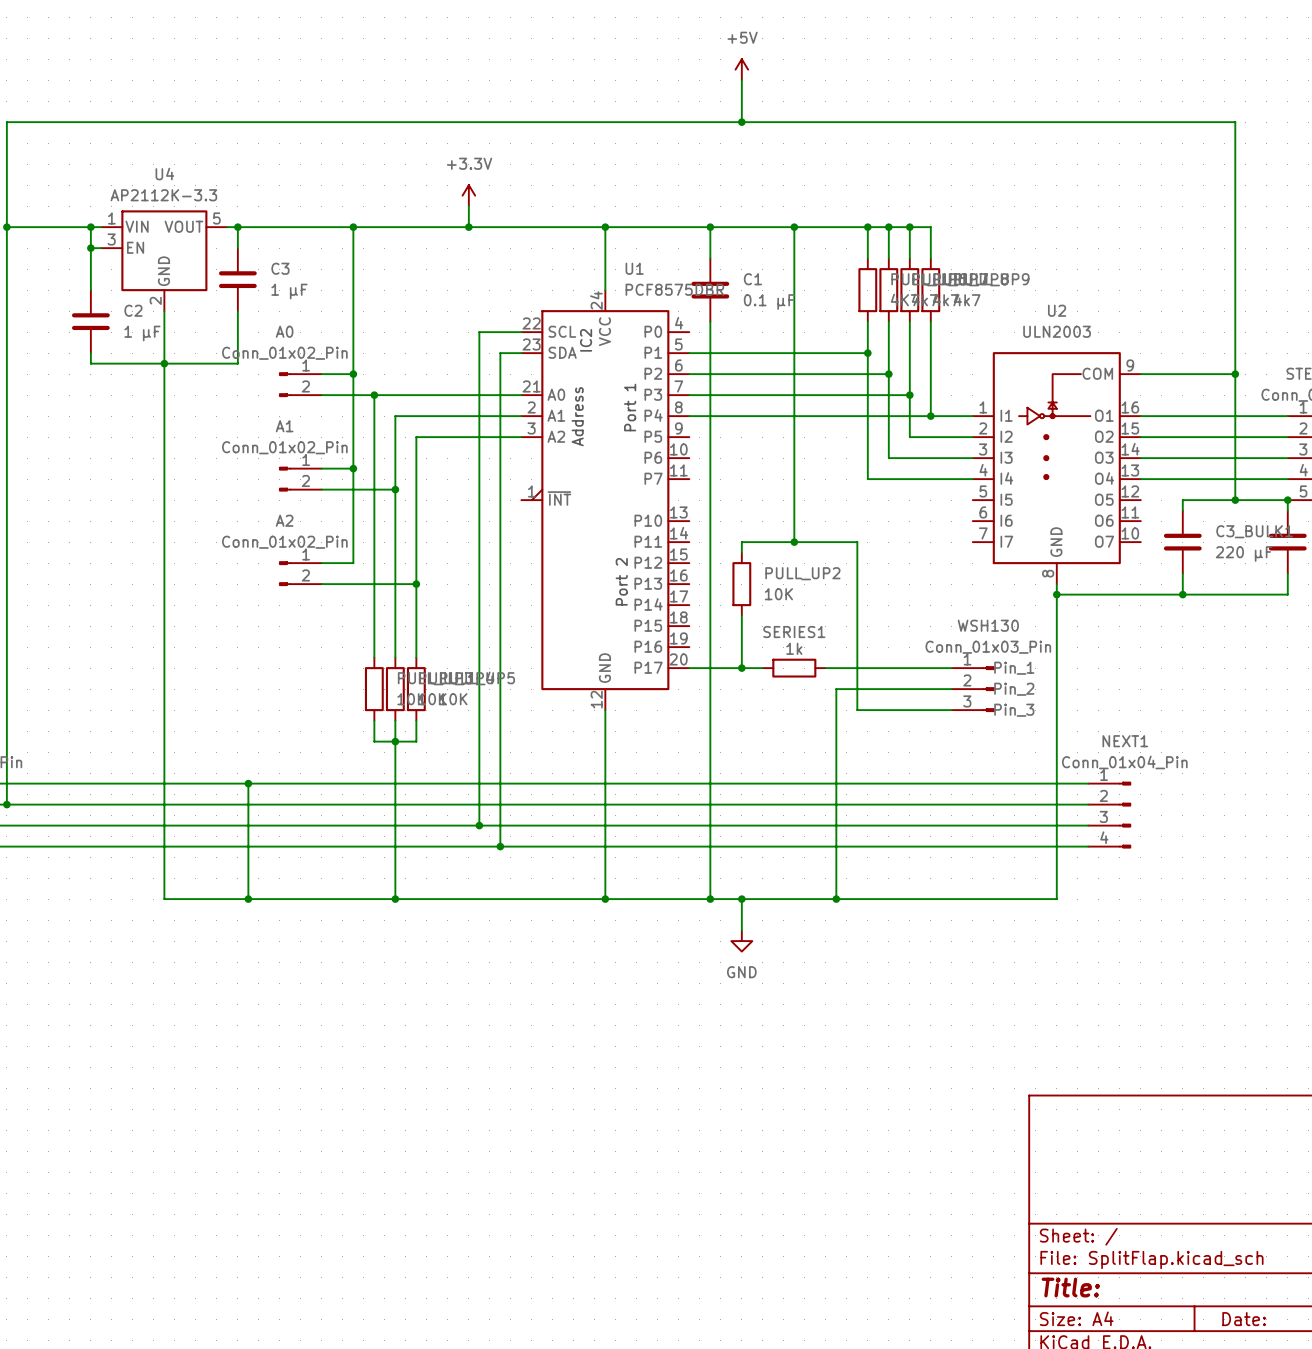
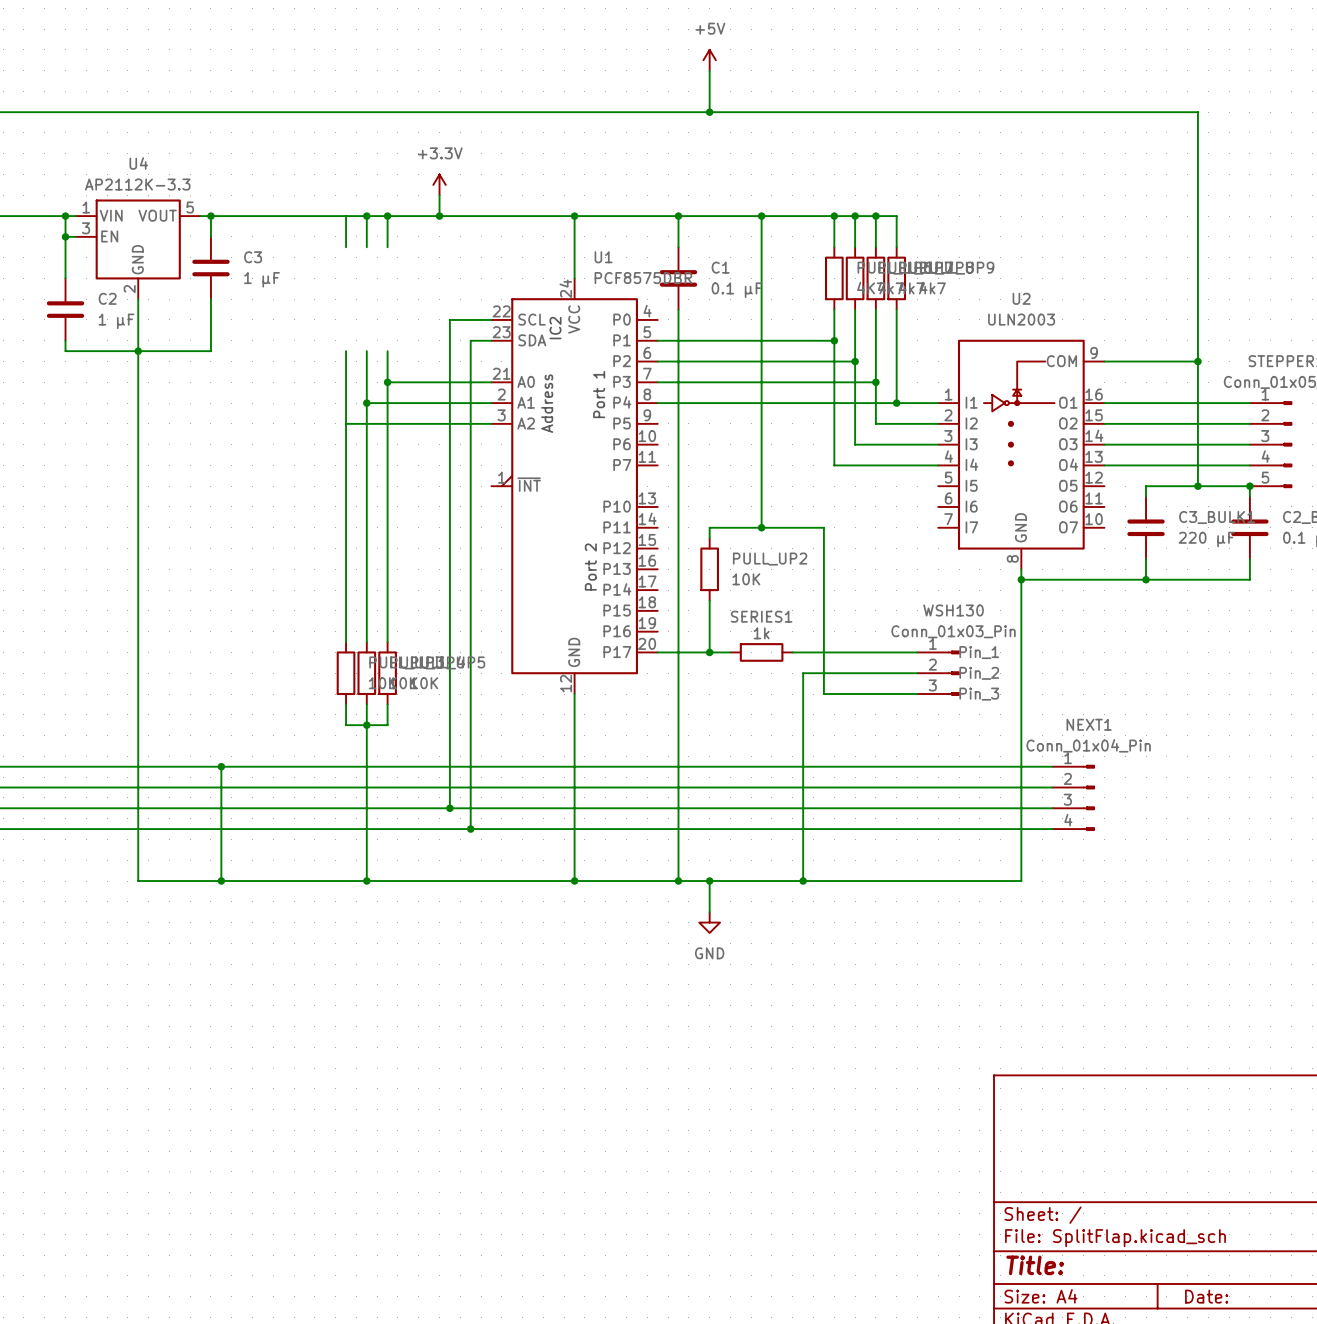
wire: (353, 227) (353, 563) (321, 563) -> none
junction: (353, 227) -> none
wire: none -> (346, 216) (346, 247)
wire: none -> (366, 216) (366, 247)
junction: none -> (366, 216)
wire: none -> (387, 216) (387, 247)
junction: none -> (387, 216)
wire: none -> (346, 351) (346, 382)
wire: none -> (366, 351) (366, 403)
wire: none -> (387, 351) (387, 423) (346, 423)
wire: (321, 374) (353, 374) -> none
junction: (353, 374) -> none
A0: Conn_01x02_Pin (300, 384) -> none
wire: (321, 395) (416, 395) -> none
junction: (374, 395) -> none
junction: none -> (387, 382)
junction: none -> (366, 403)
wire: (321, 468) (353, 468) -> none
junction: (353, 468) -> none
A1: Conn_01x02_Pin (300, 479) -> none
wire: (321, 489) (395, 489) -> none
junction: (395, 489) -> none
A2: Conn_01x02_Pin (300, 573) -> none
wire: (321, 584) (416, 584) -> none
junction: (416, 584) -> none

